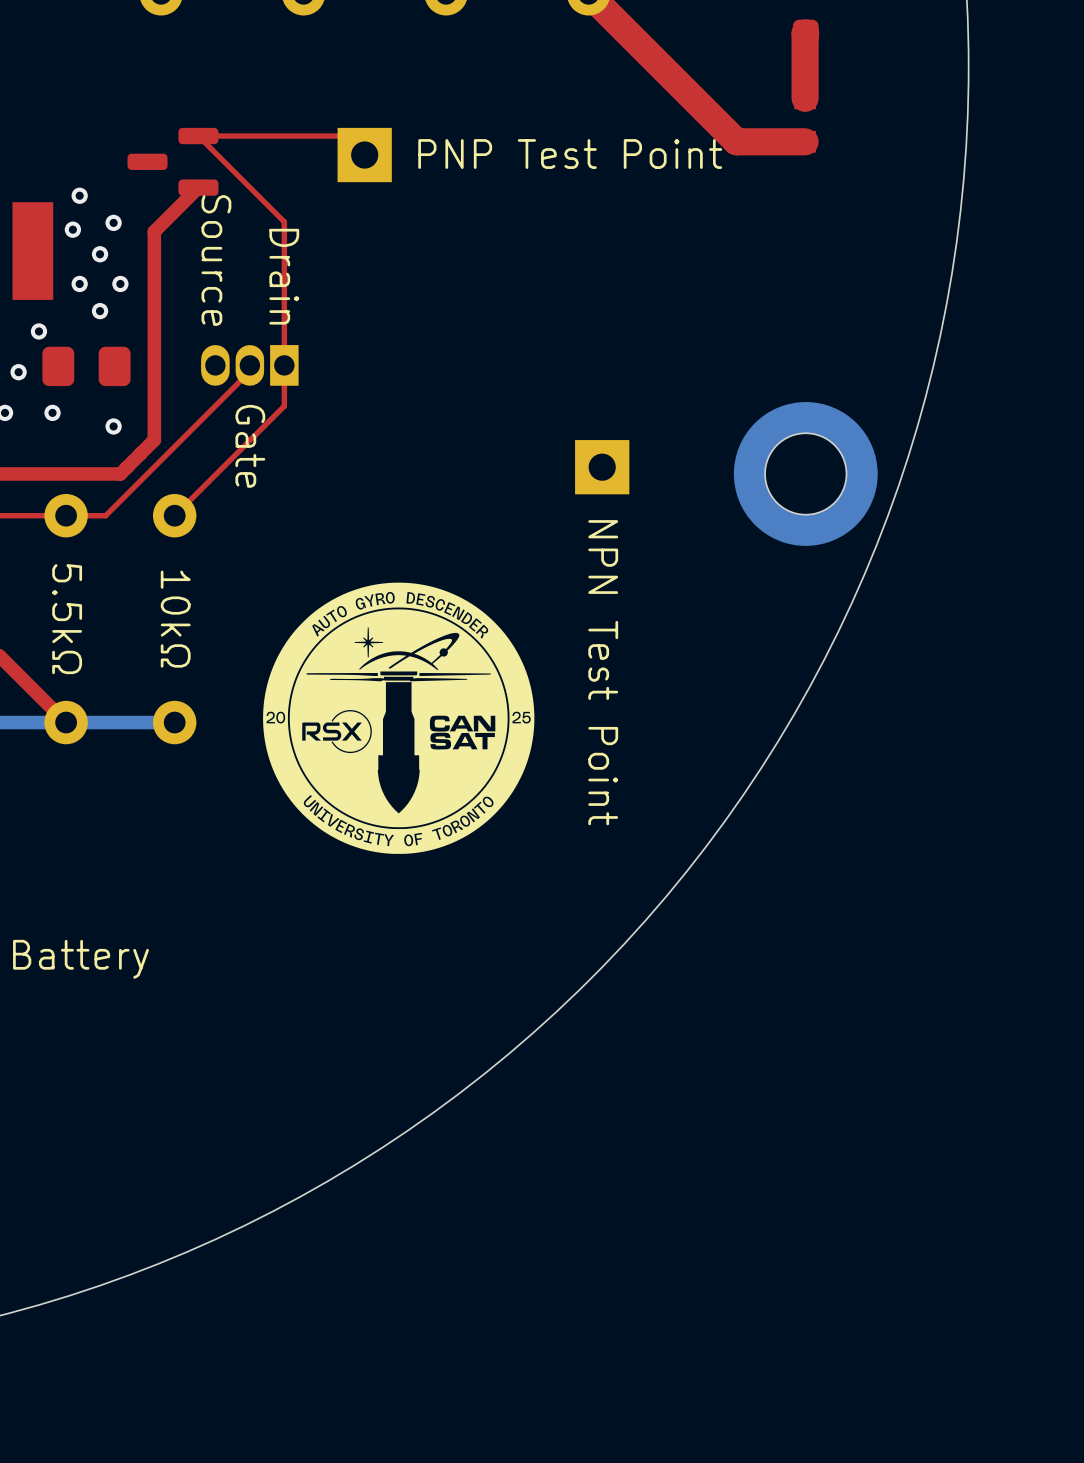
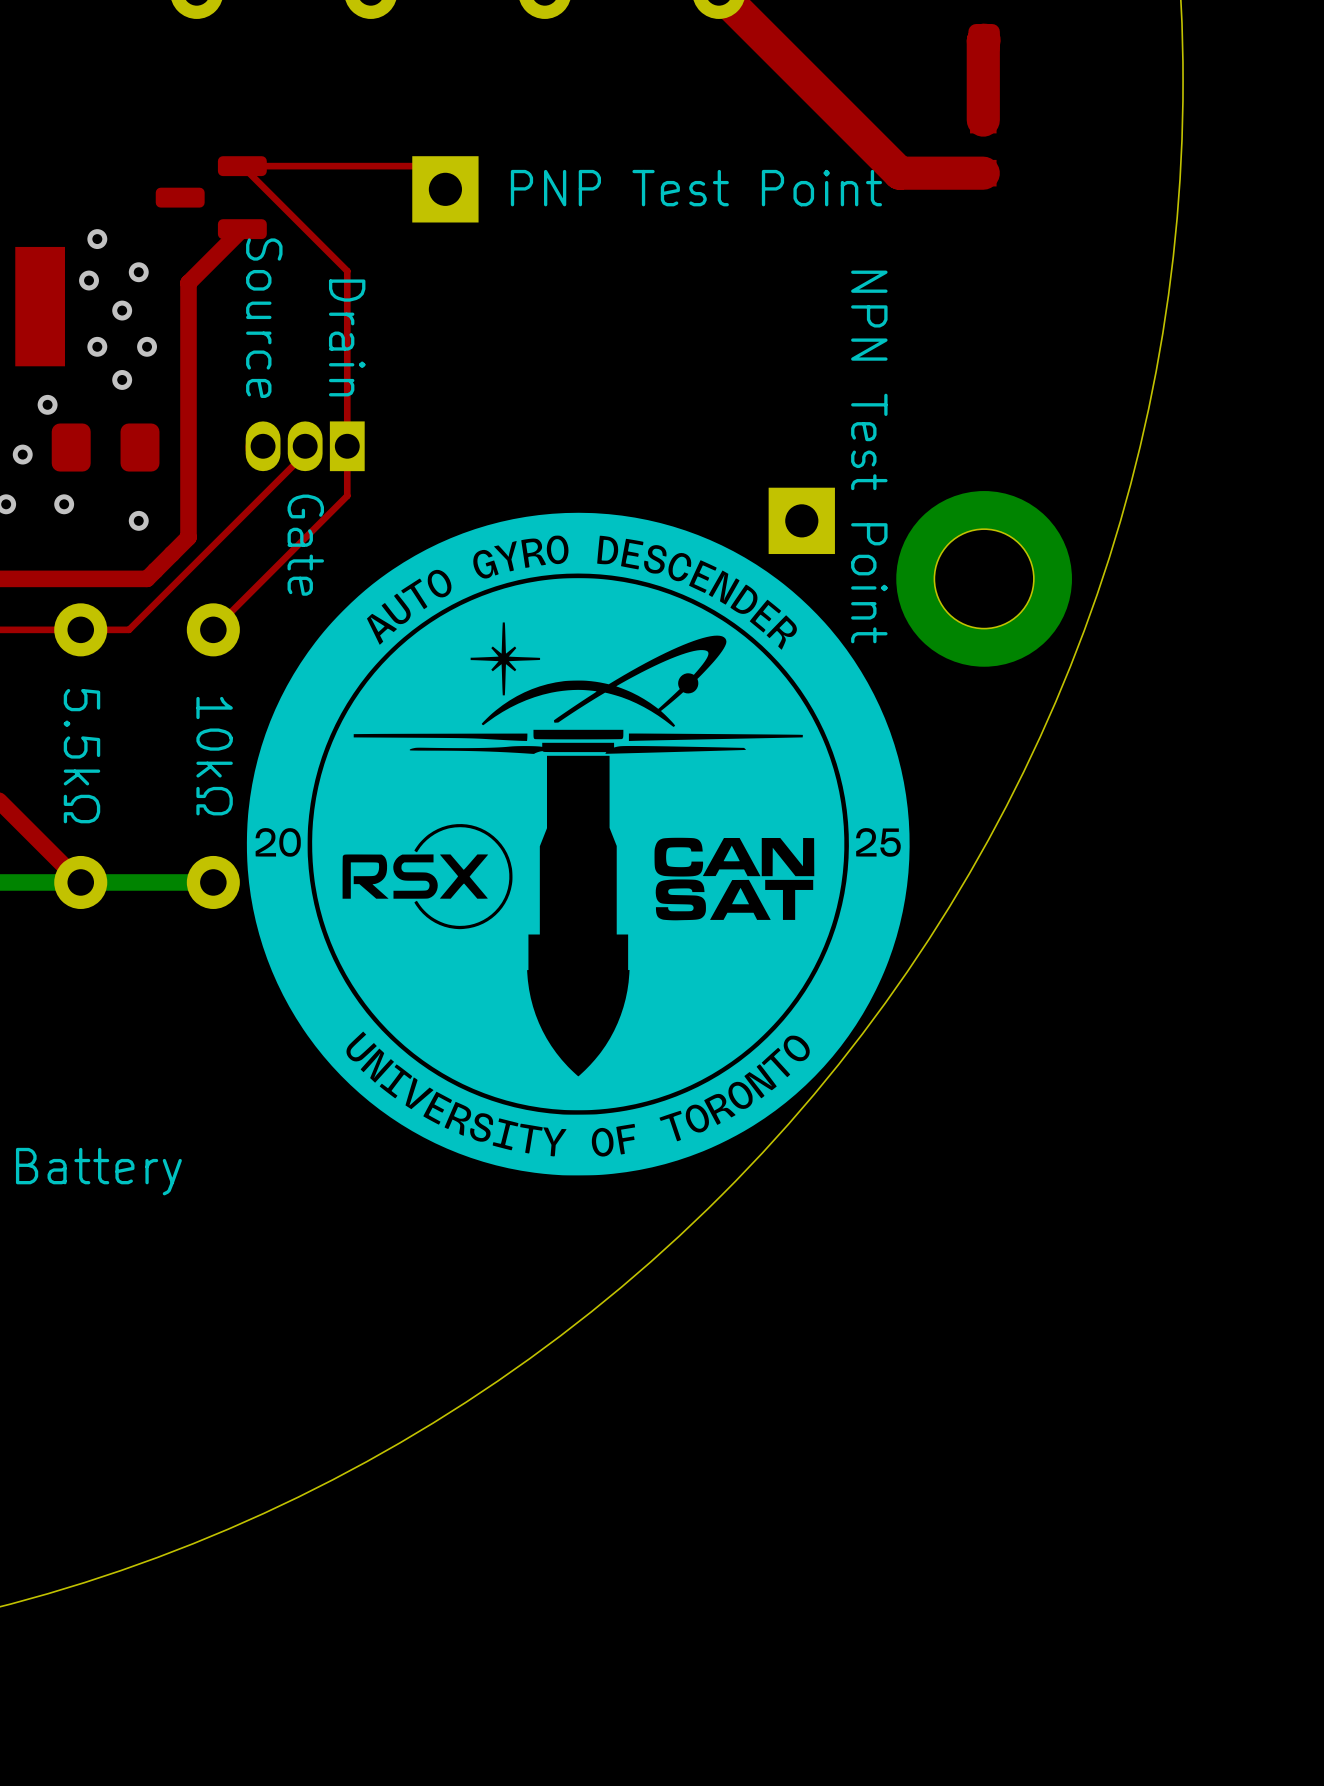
drawing: none -> [246, 512, 910, 1176]
part position: (602, 467) -> (801, 520)
drawing: [263, 582, 535, 854] -> none
text position: NPN Test Point (603, 672) -> NPN Test Point (869, 456)

